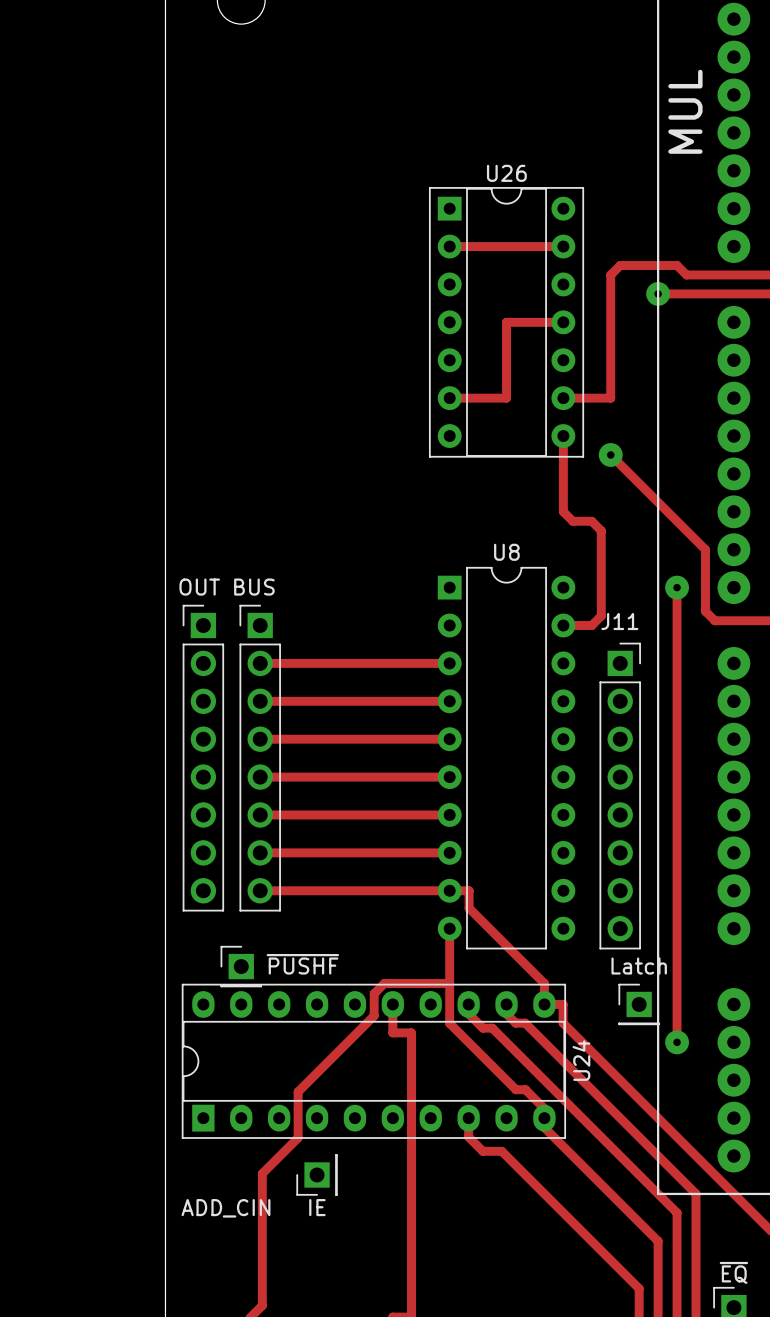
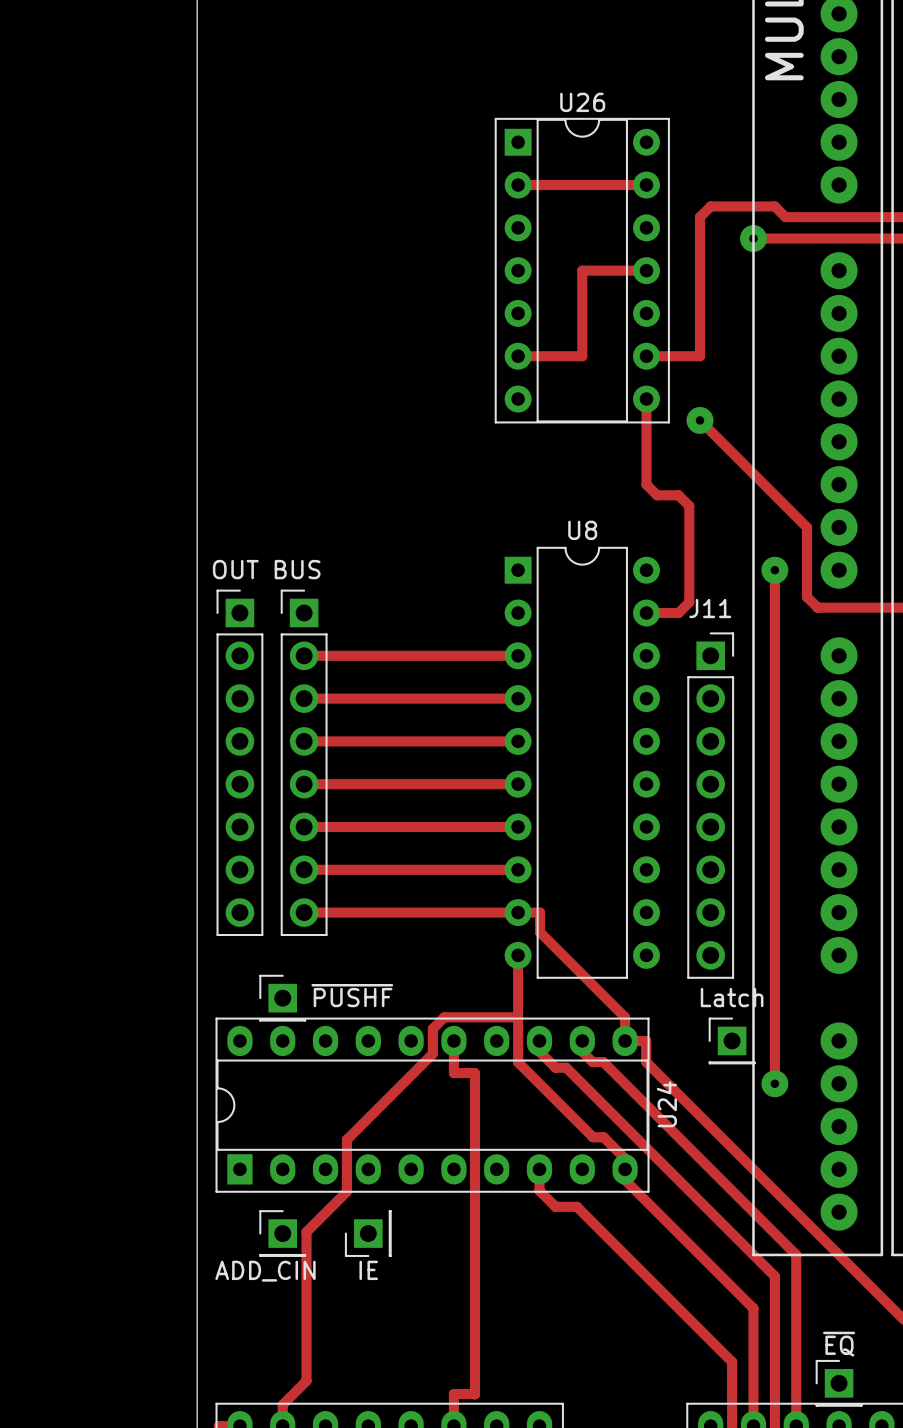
part: none -> (282, 1233)

